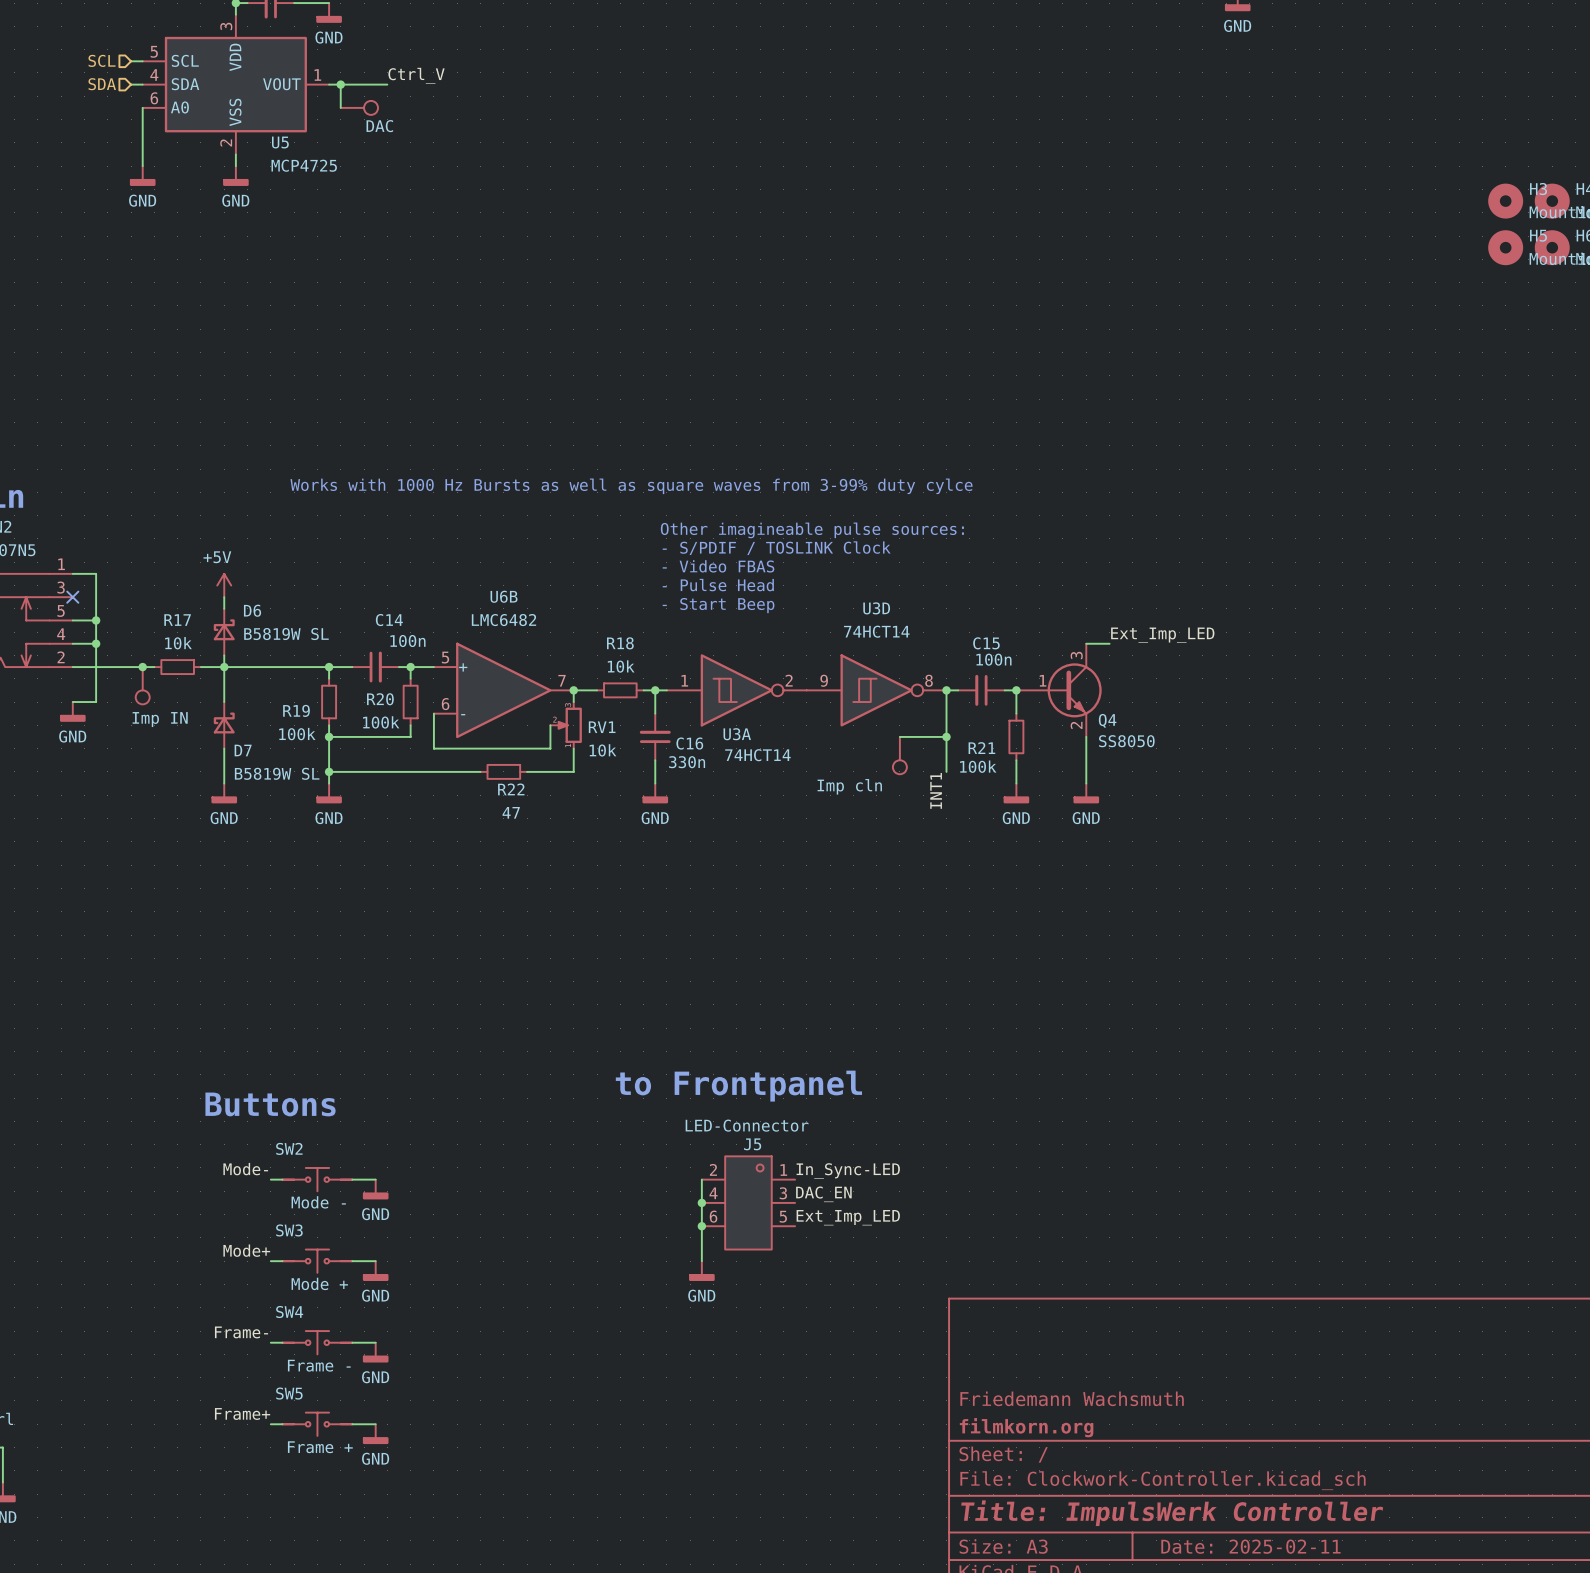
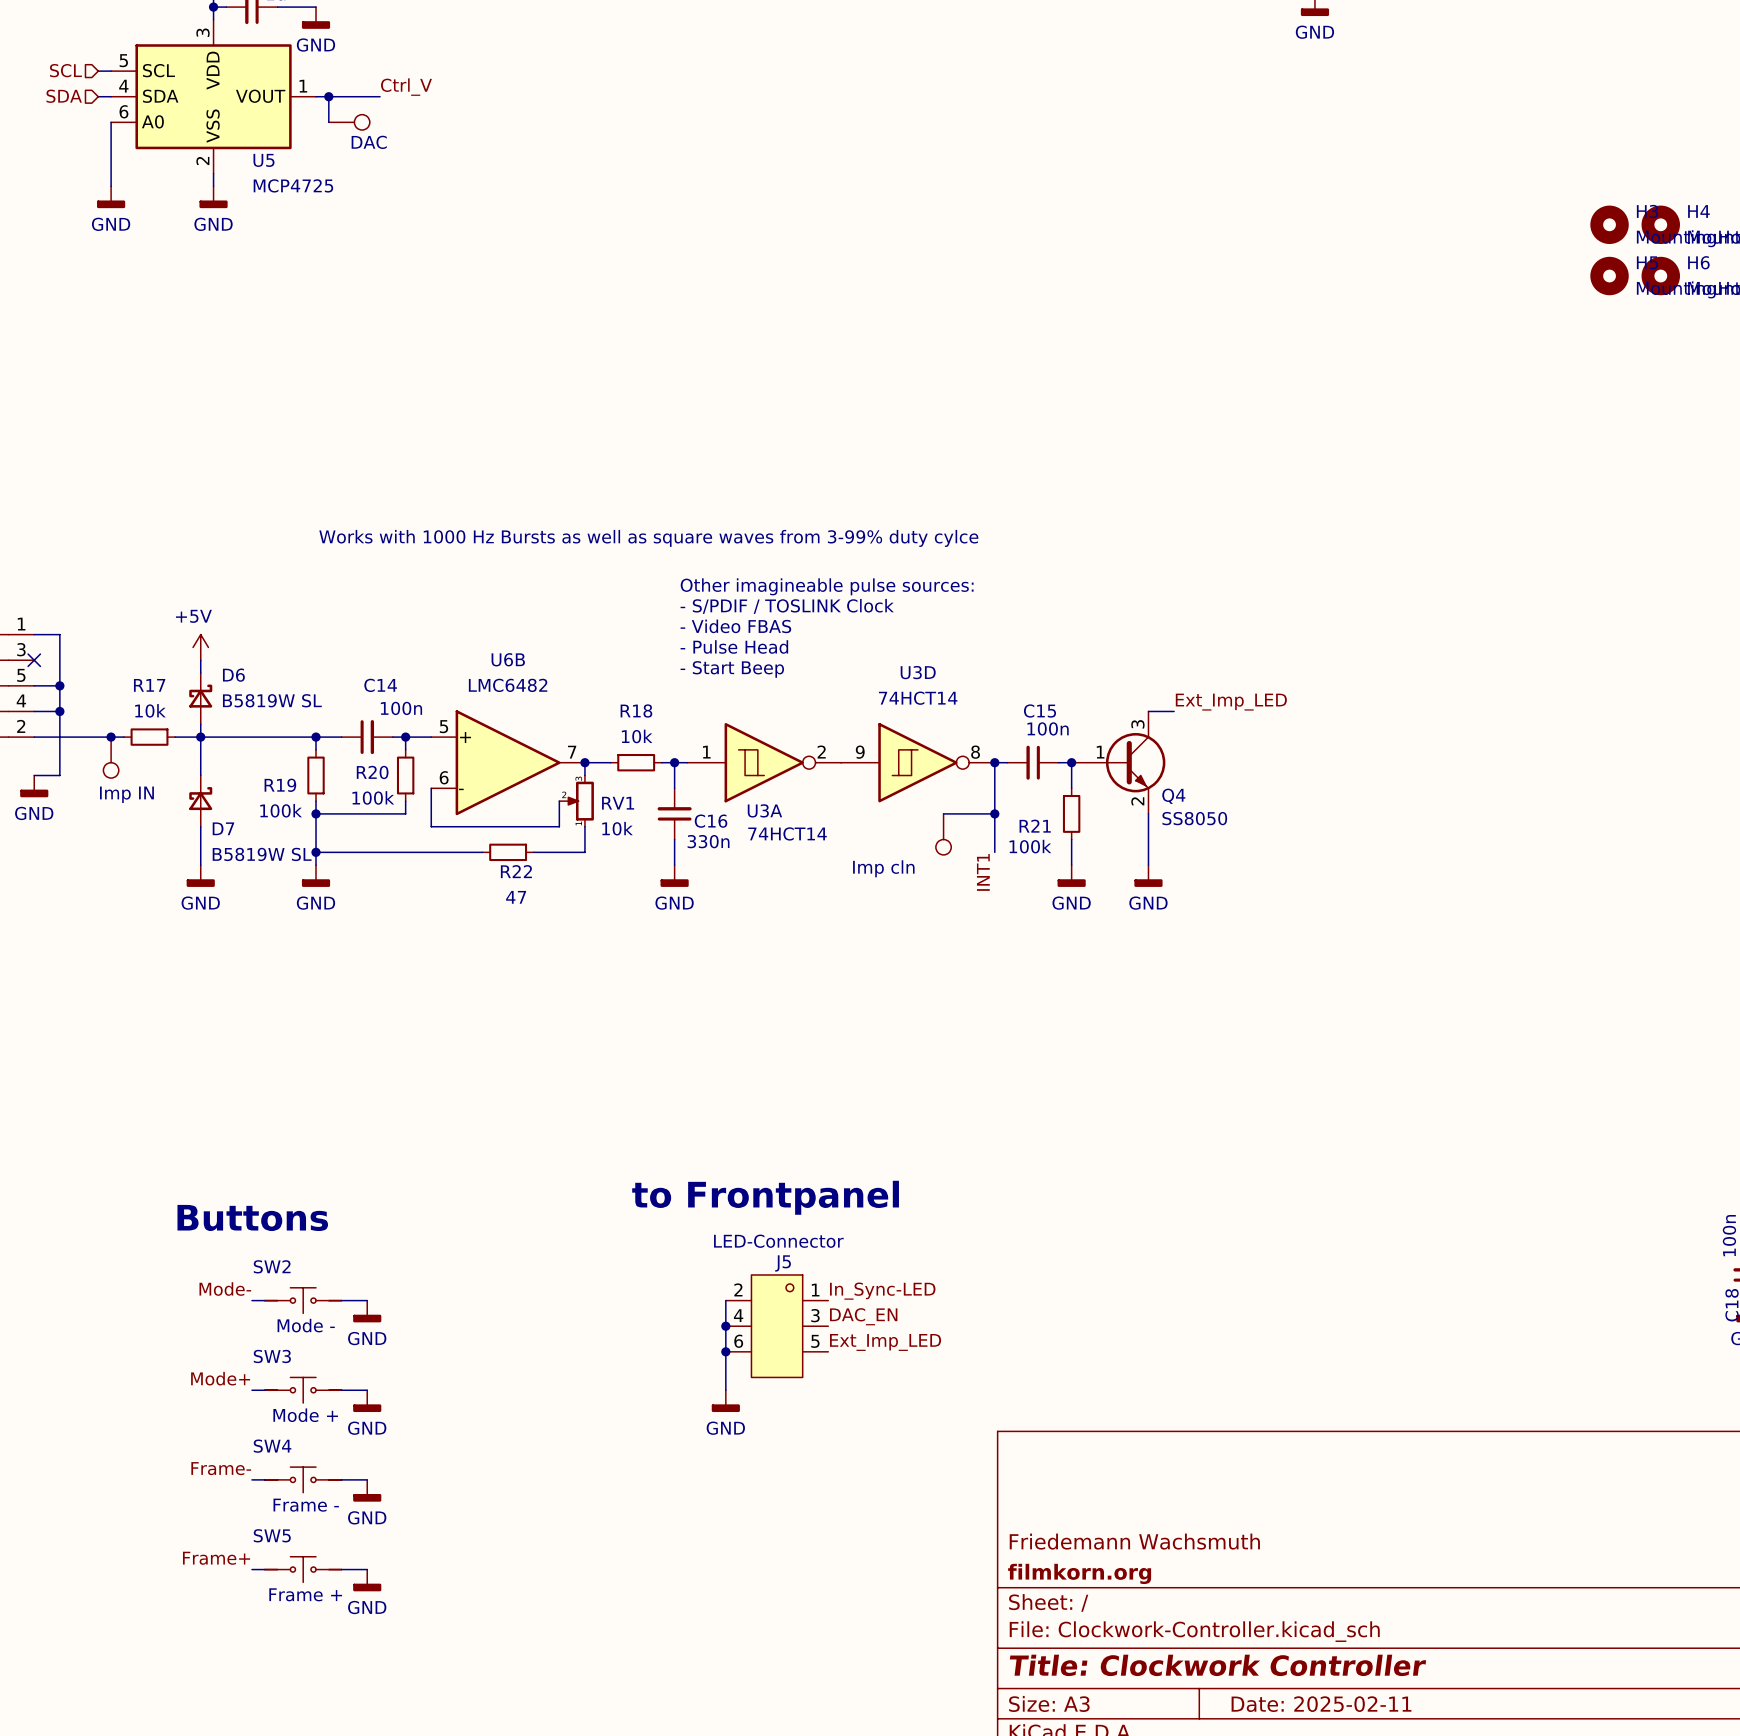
title block: Title: ImpulsWerk Controller (1172, 1513) -> Title: Clockwork Controller (1217, 1665)

